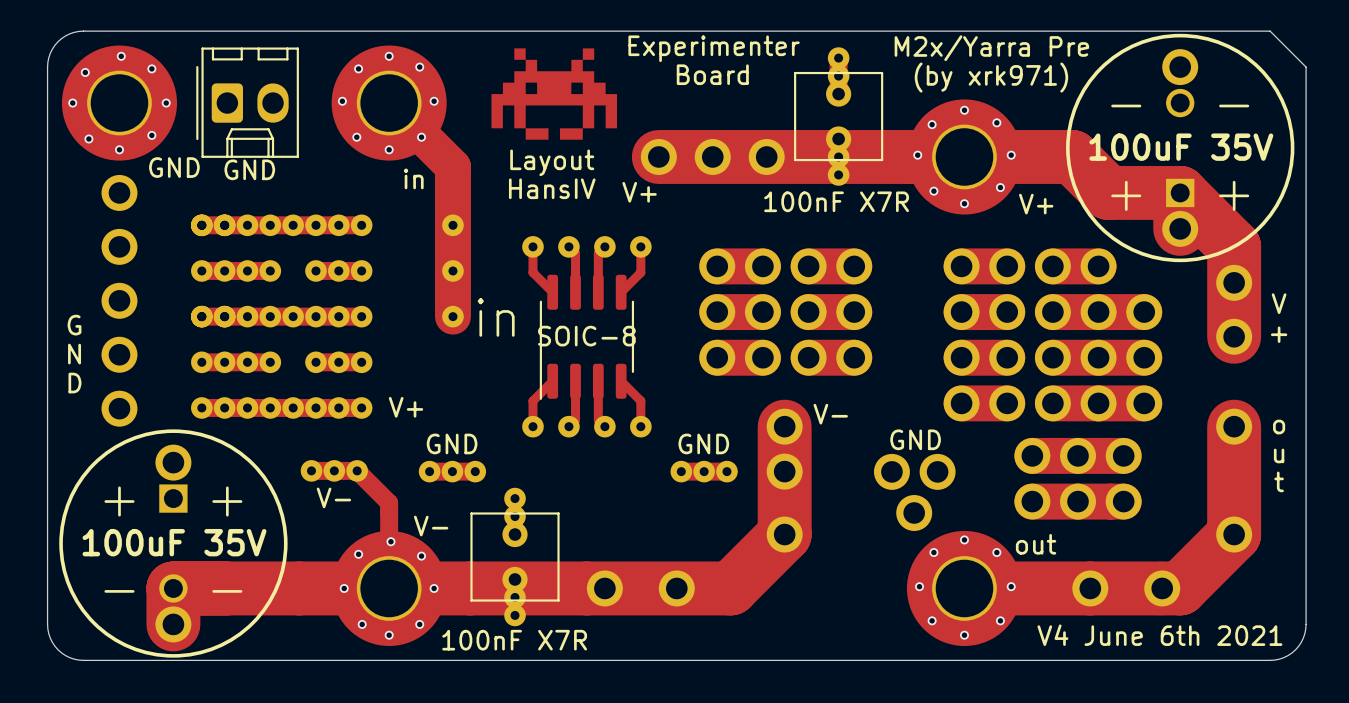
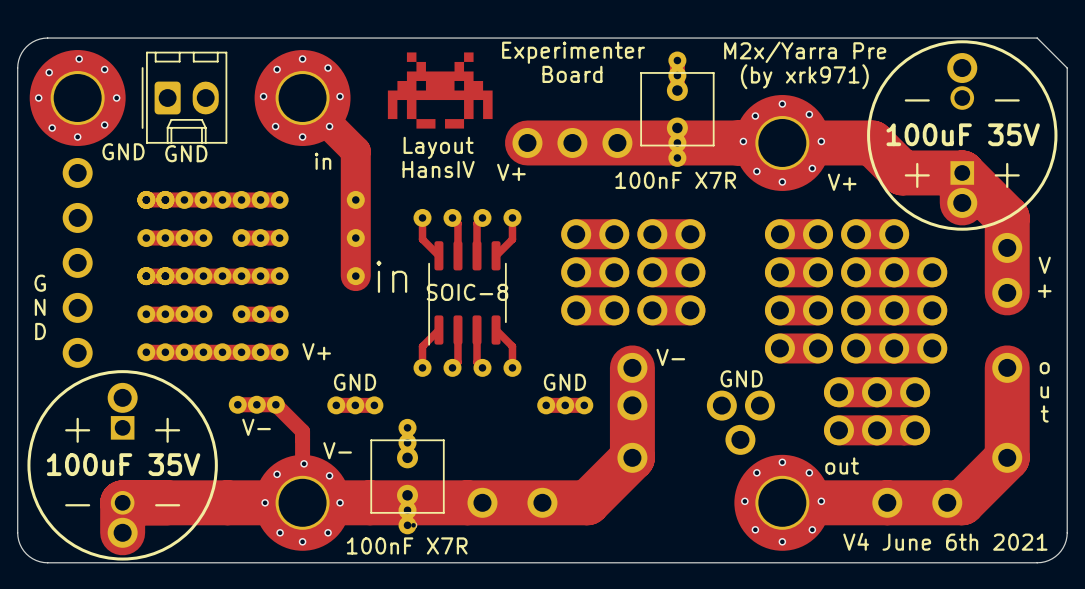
via: none -> (413, 525)

